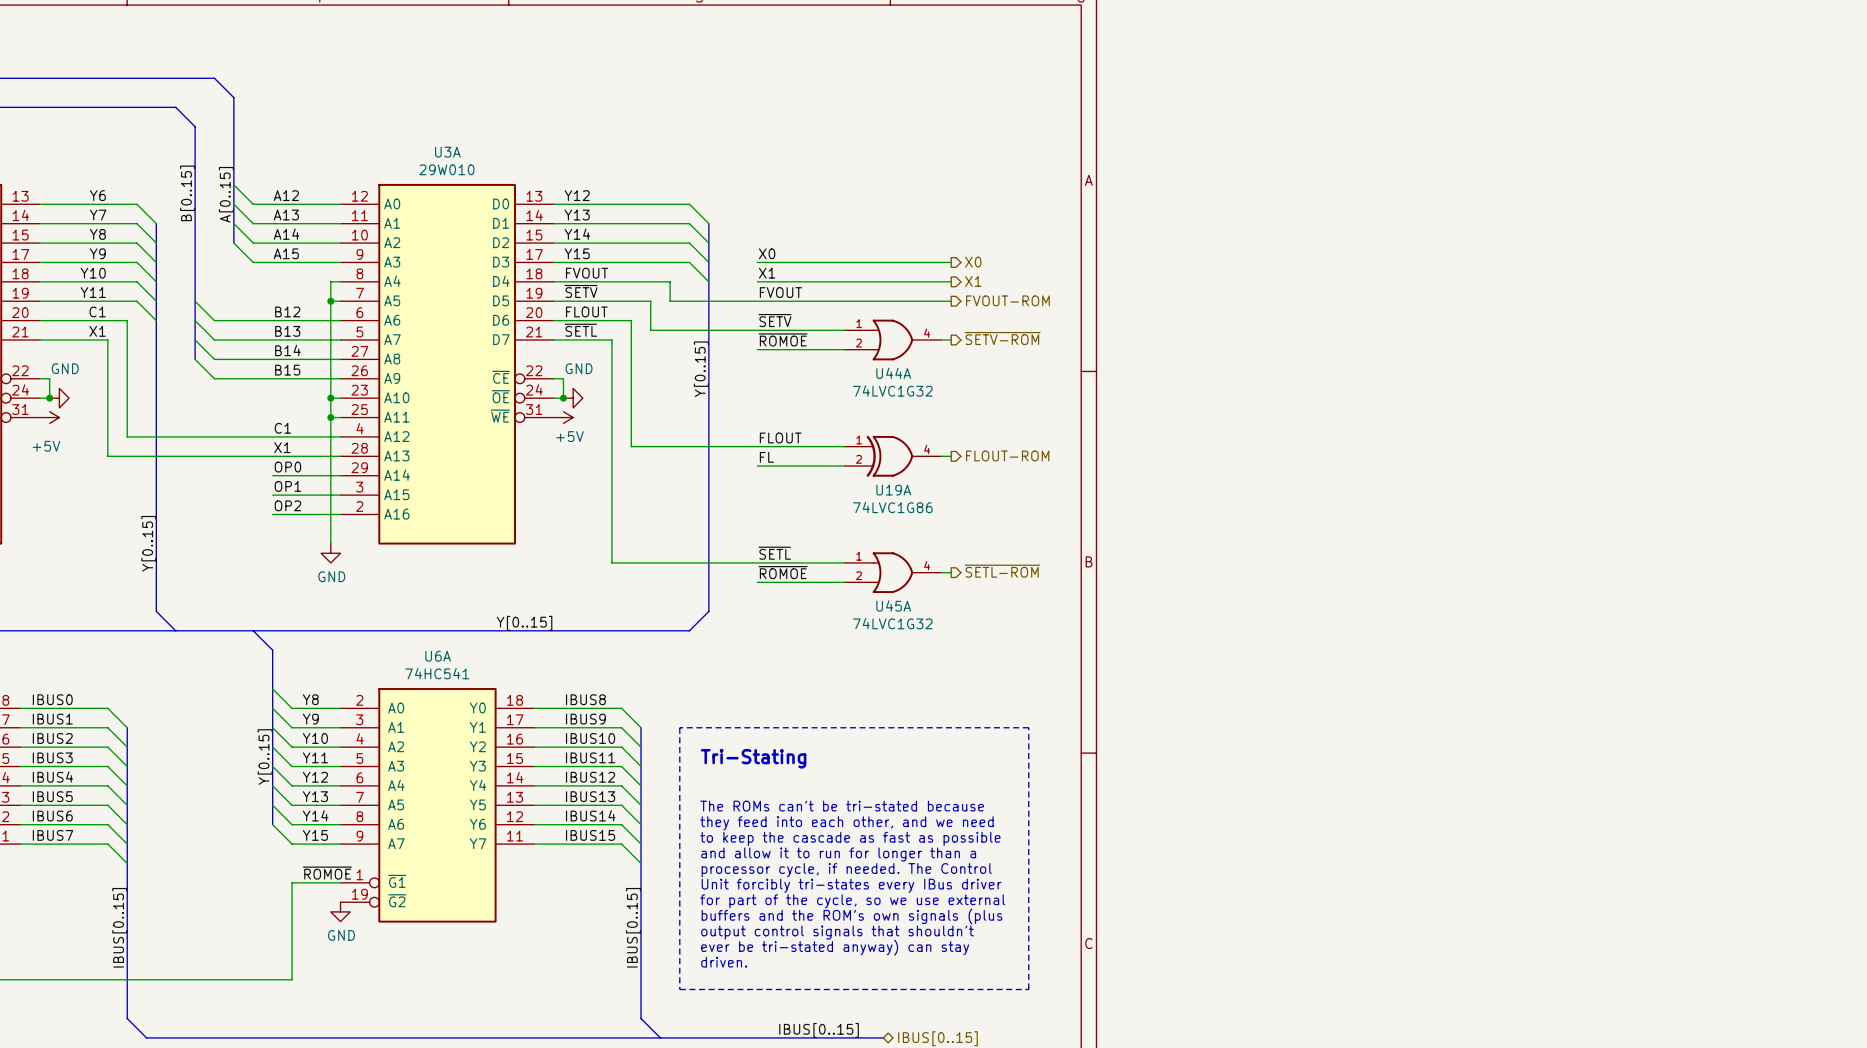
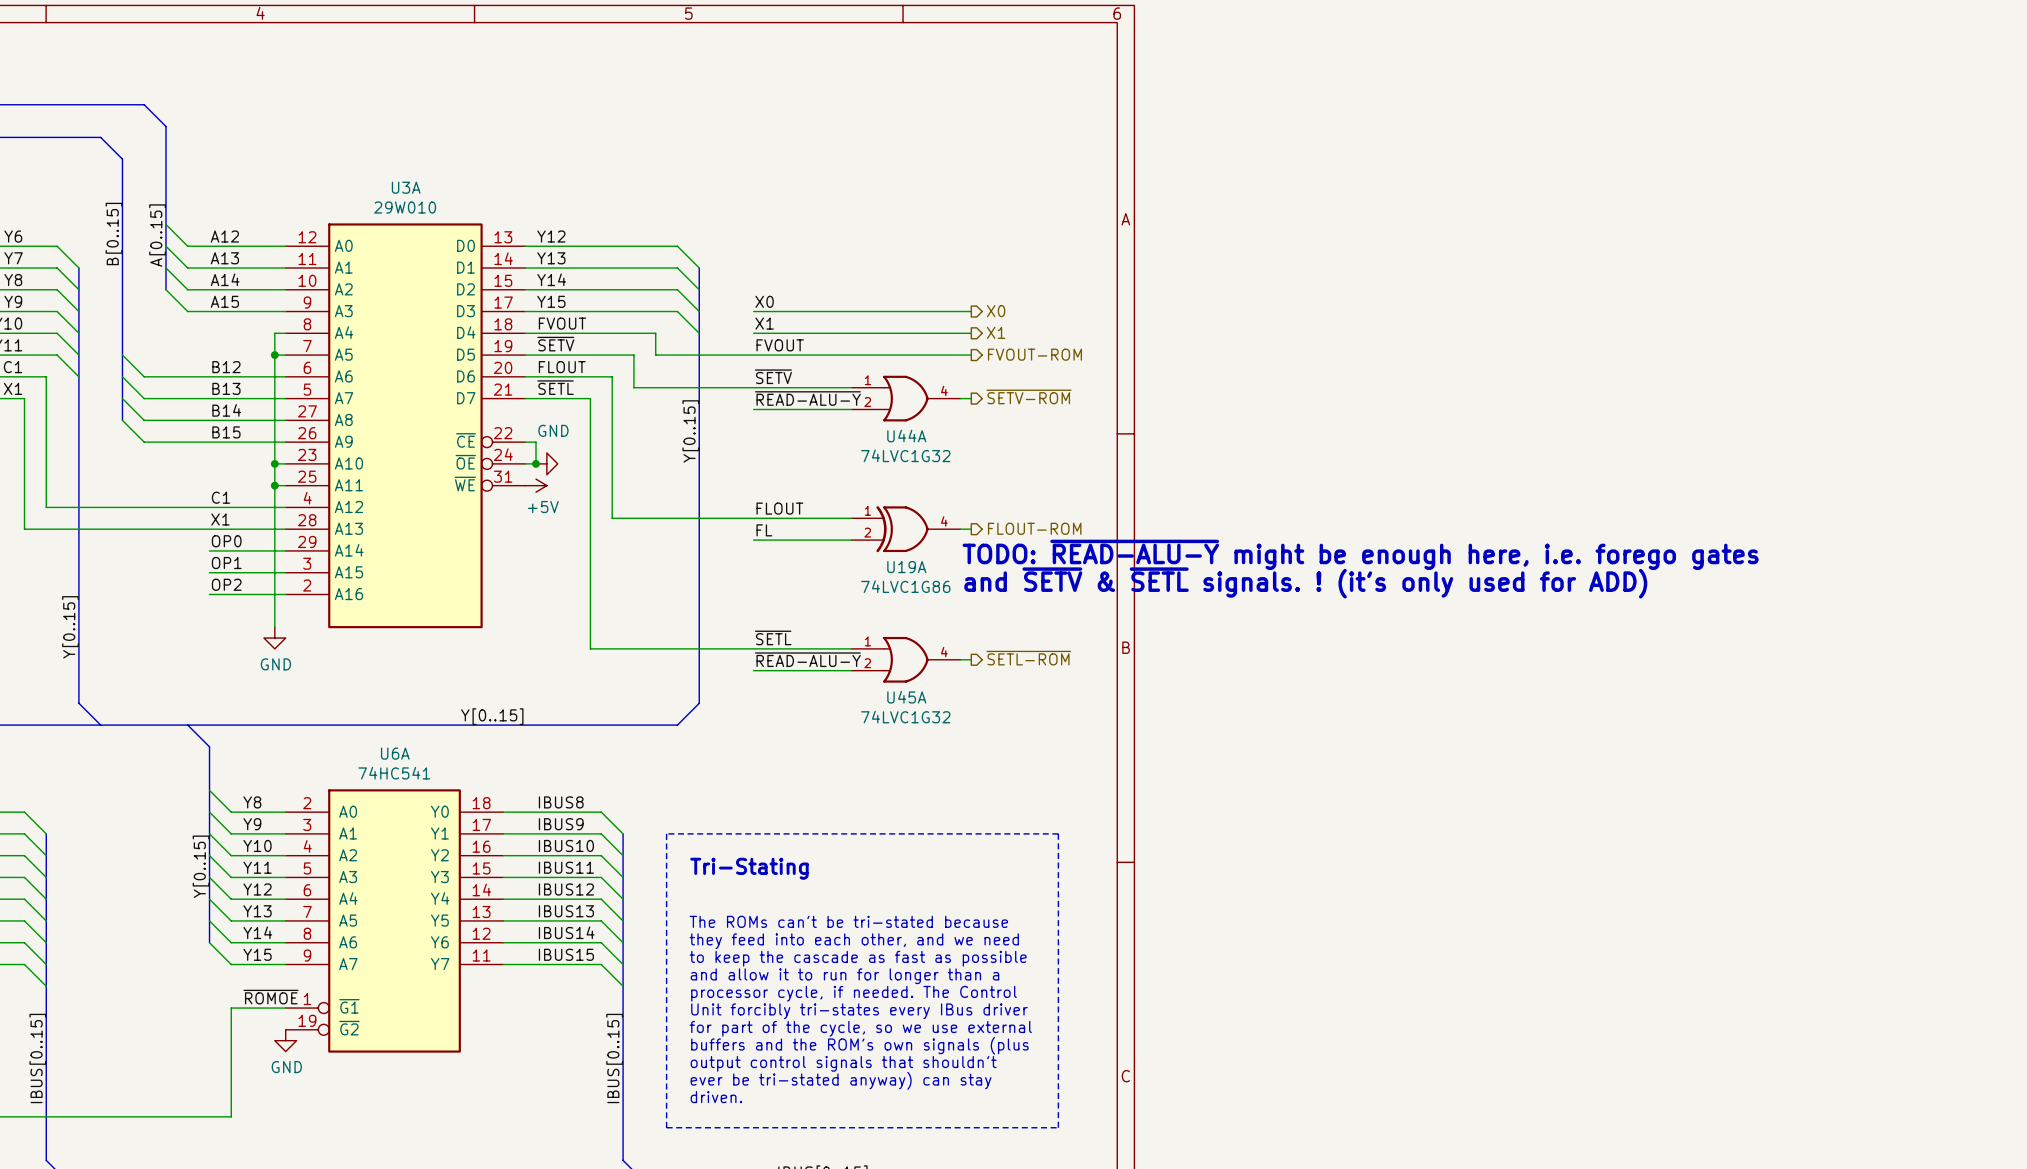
label: ~{ROMOE} (783, 339) -> ~{READ-ALU-Y} (807, 398)
text: none -> TODO: ~{READ-ALU-Y} might be enough here, i.e. forego gates (1360, 554)
text: none -> and ~{SETV} & ~{SETL} signals. ! (it's only used for ADD) (1305, 582)
label: ~{ROMOE} (783, 572) -> ~{READ-ALU-Y} (807, 659)

